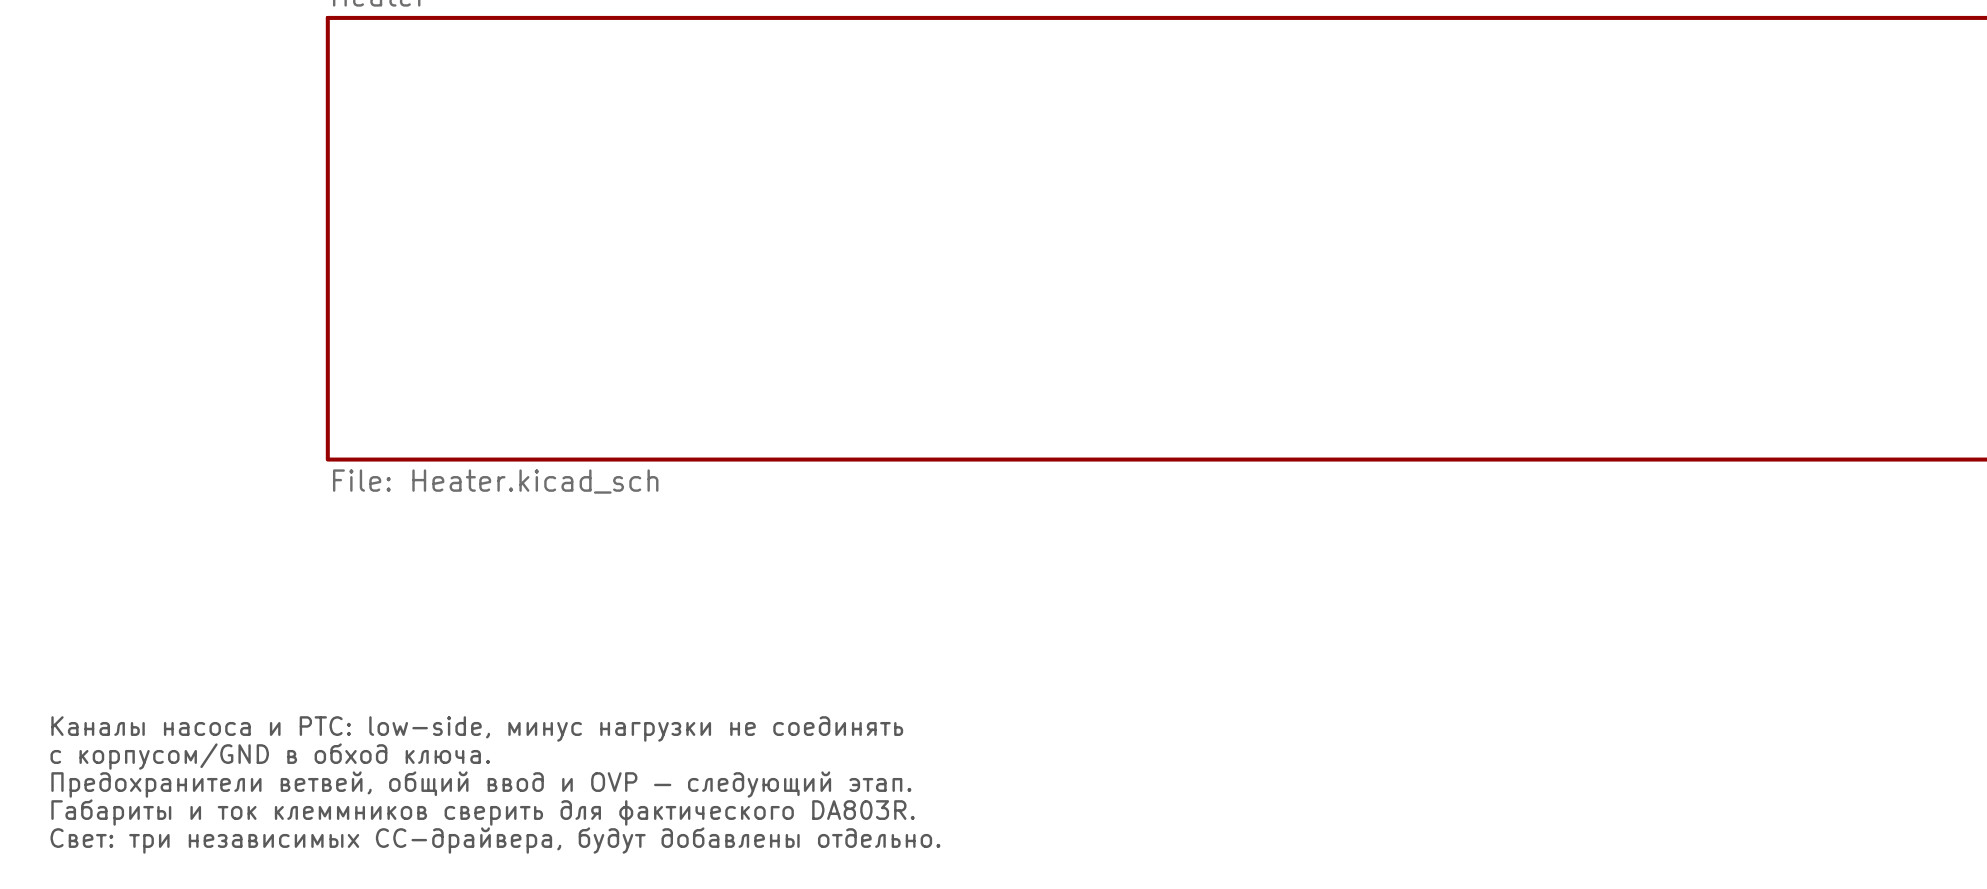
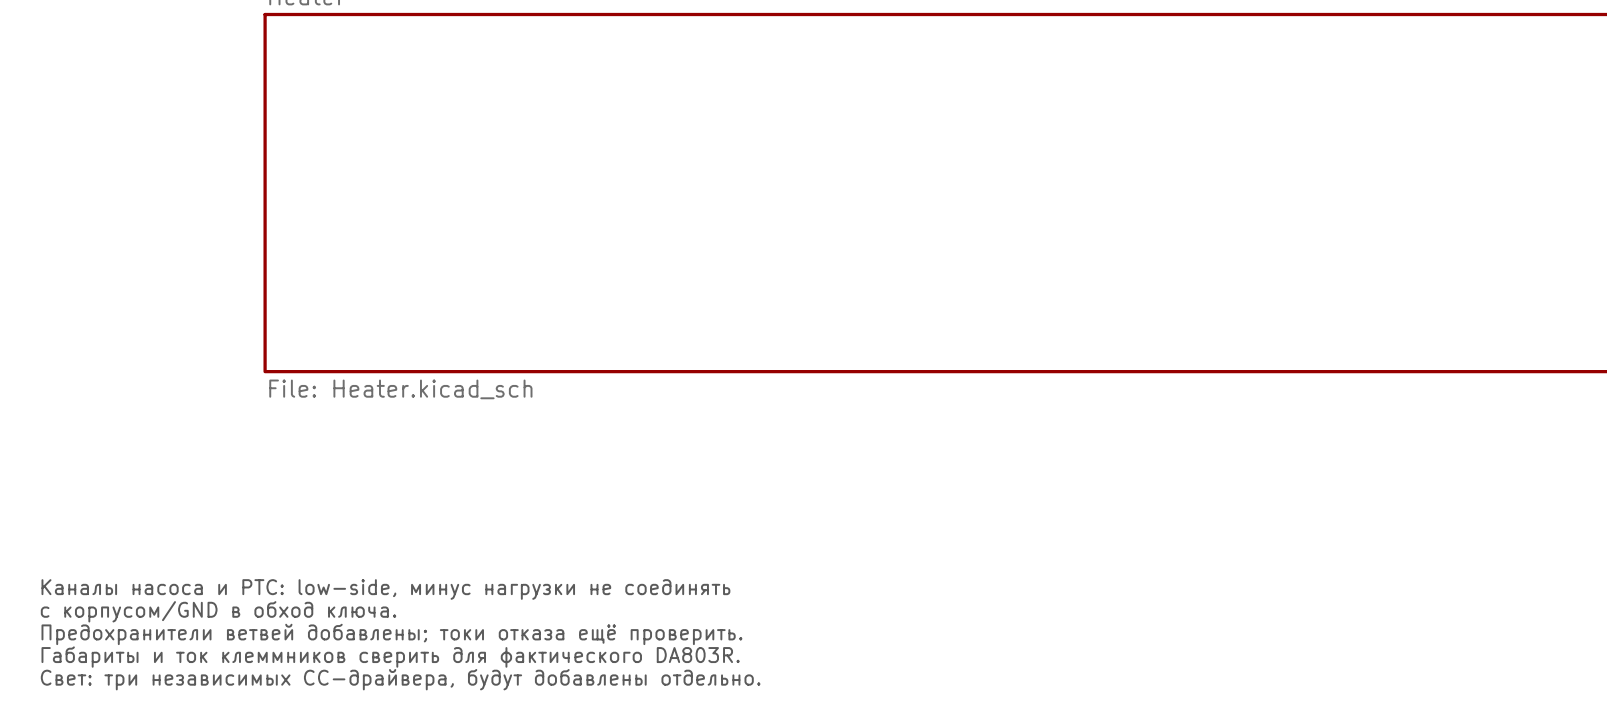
text: Предохранители ветвей, общий ввод и OVP — следующий этап. (481, 784) -> Предохранители ветвей добавлены; токи отказа ещё проверить. (391, 634)

